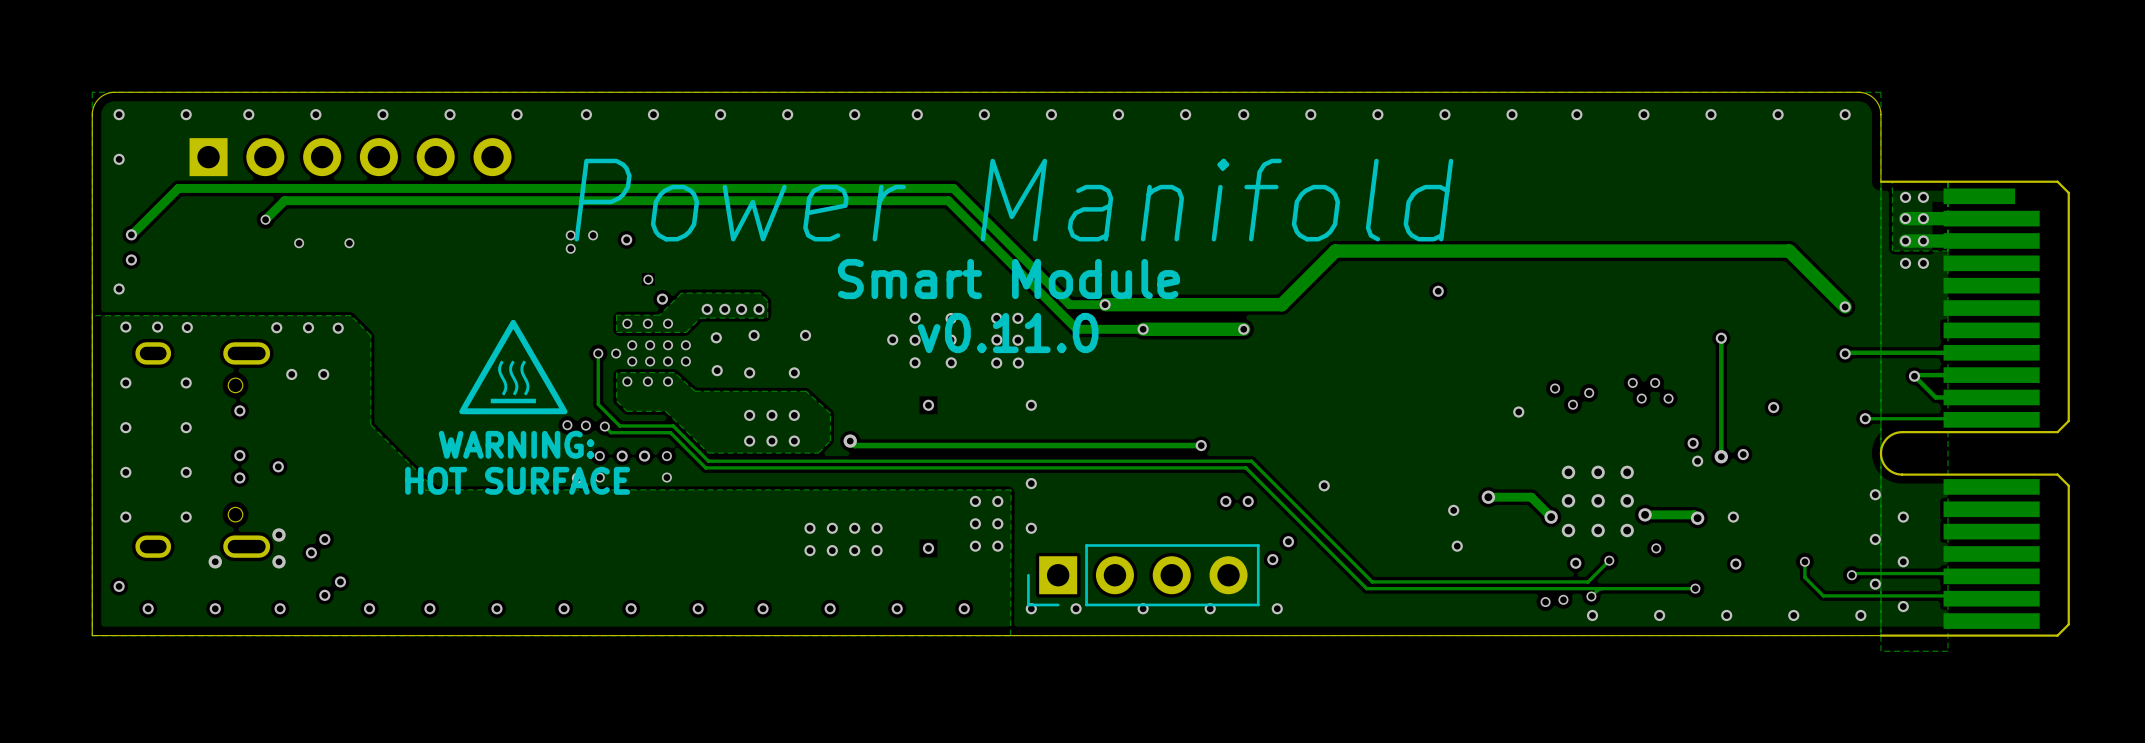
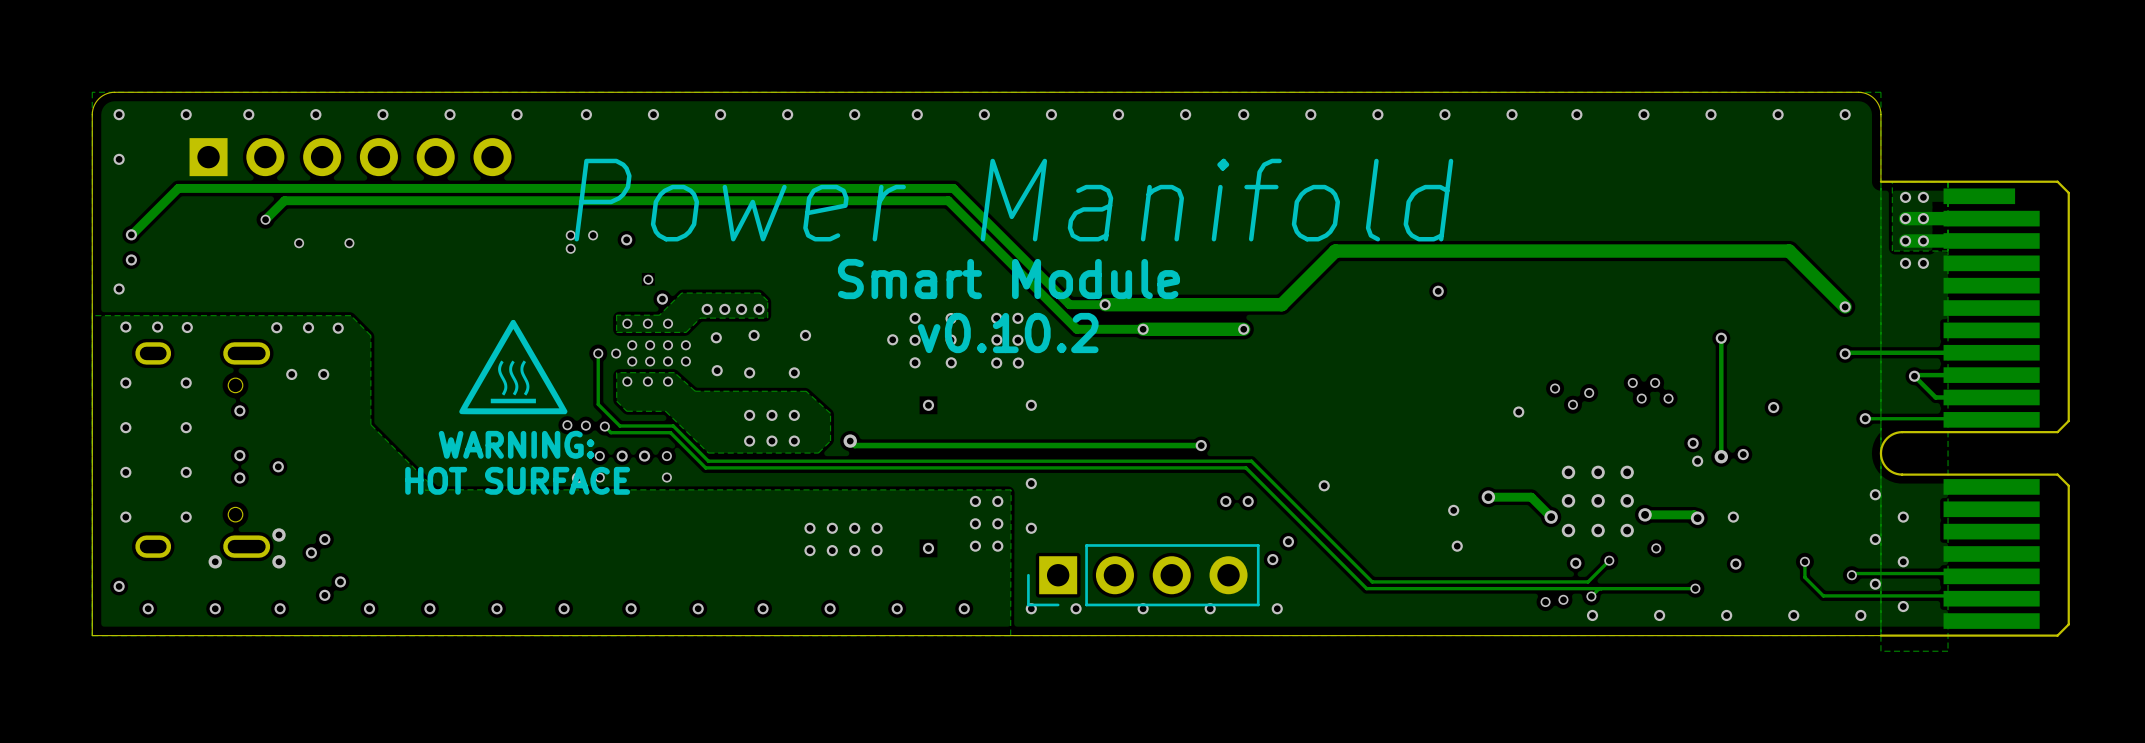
text: v0.11.0 (1008, 333) -> v0.10.2 (1008, 333)

